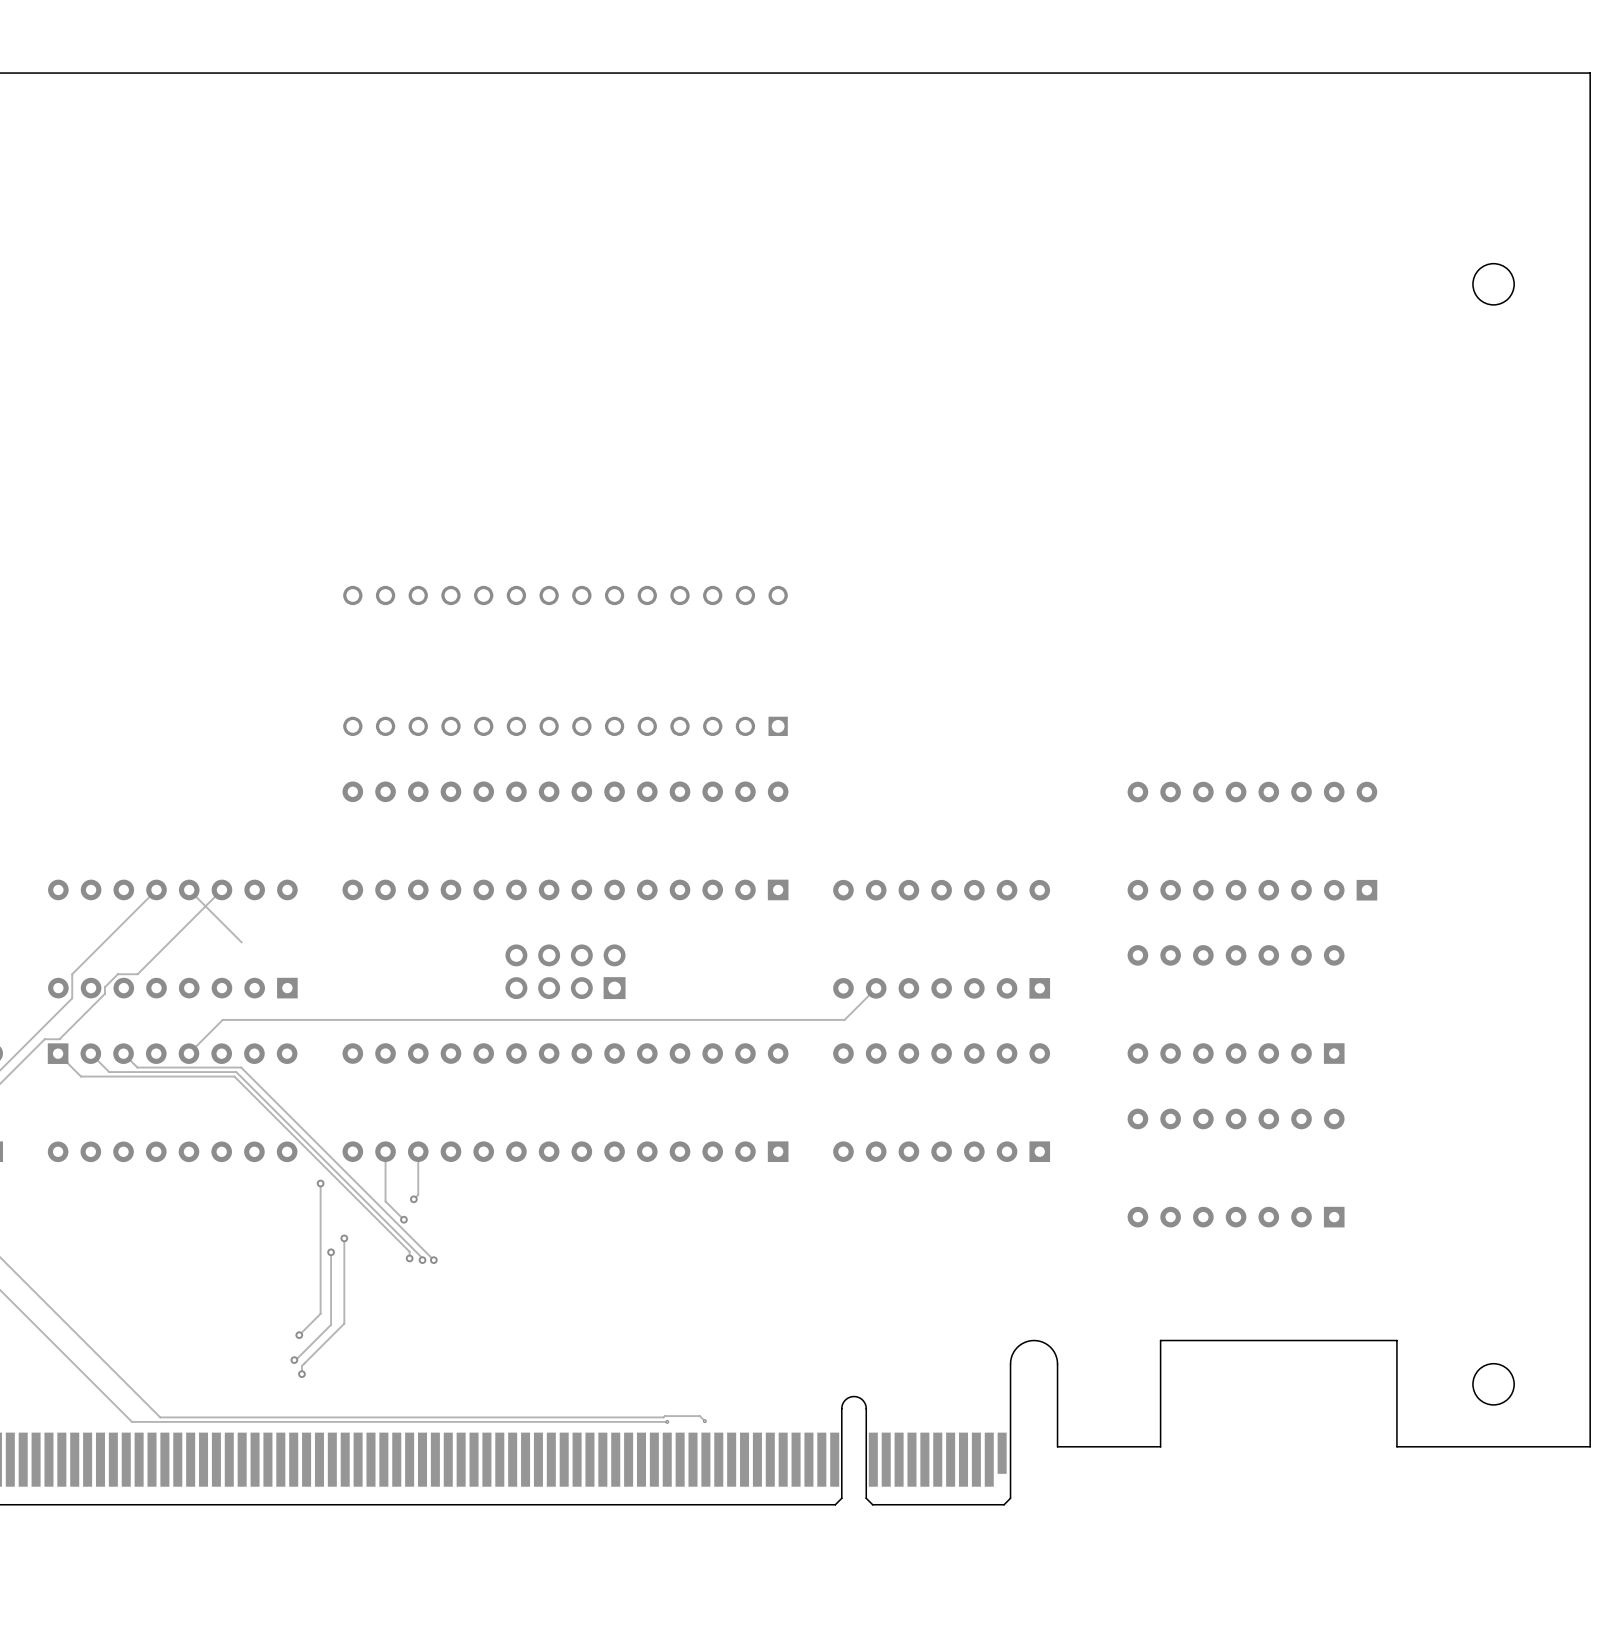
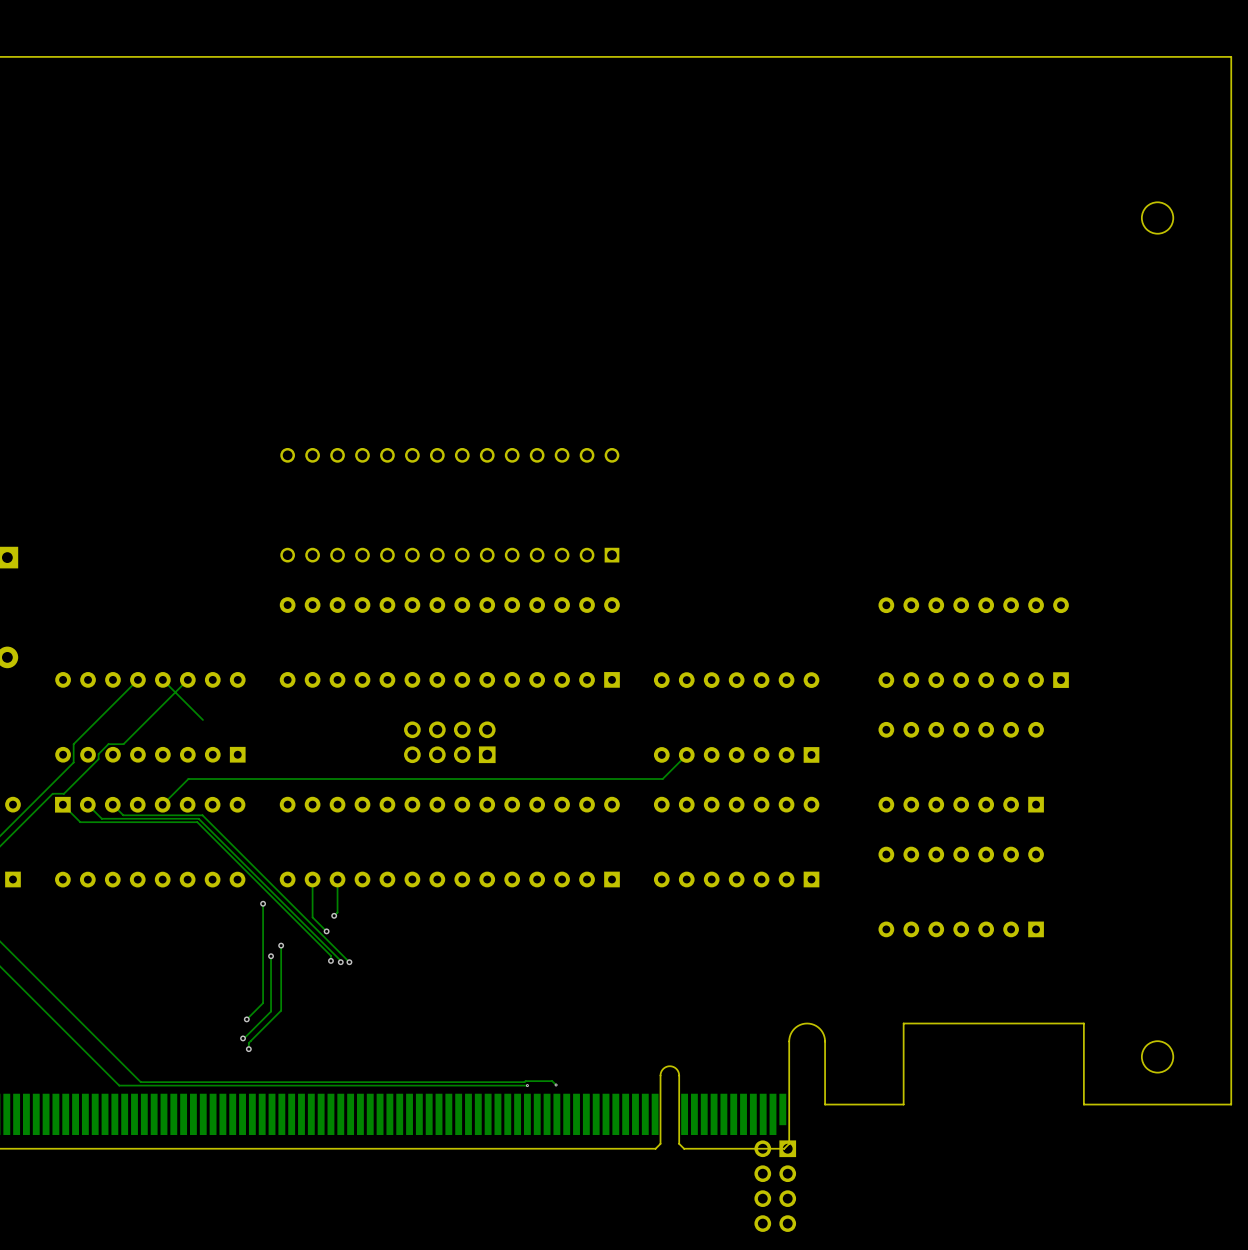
part: none -> (775, 1186)

